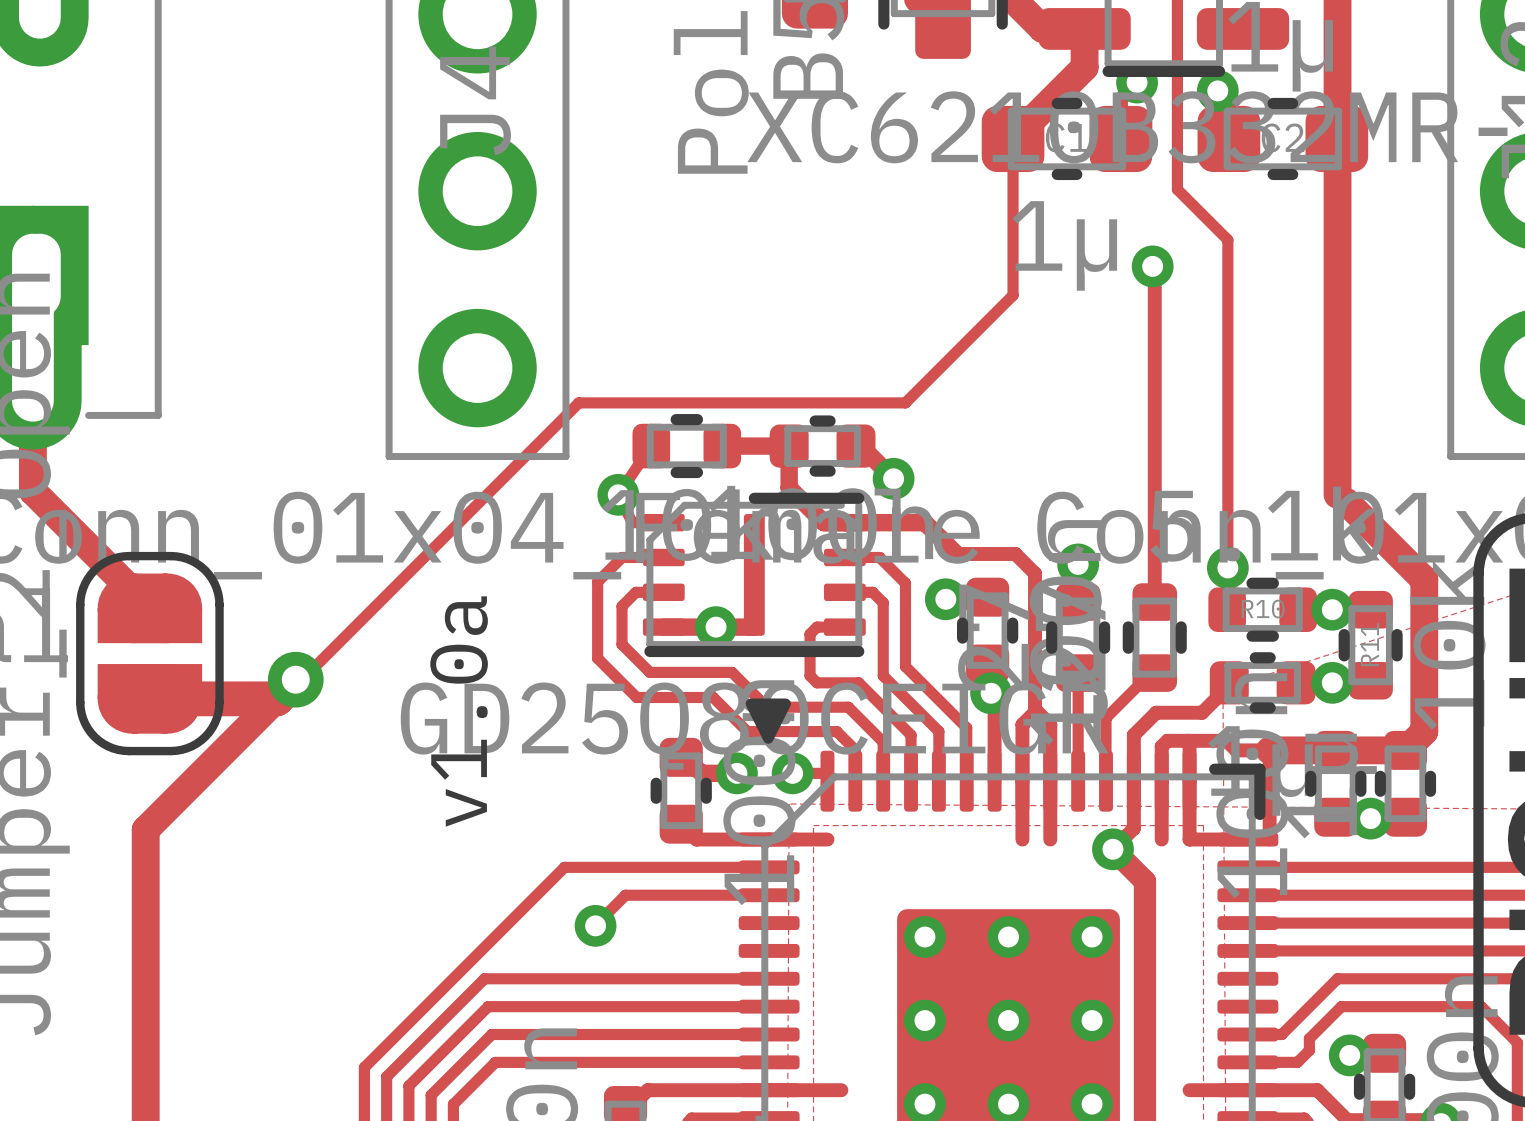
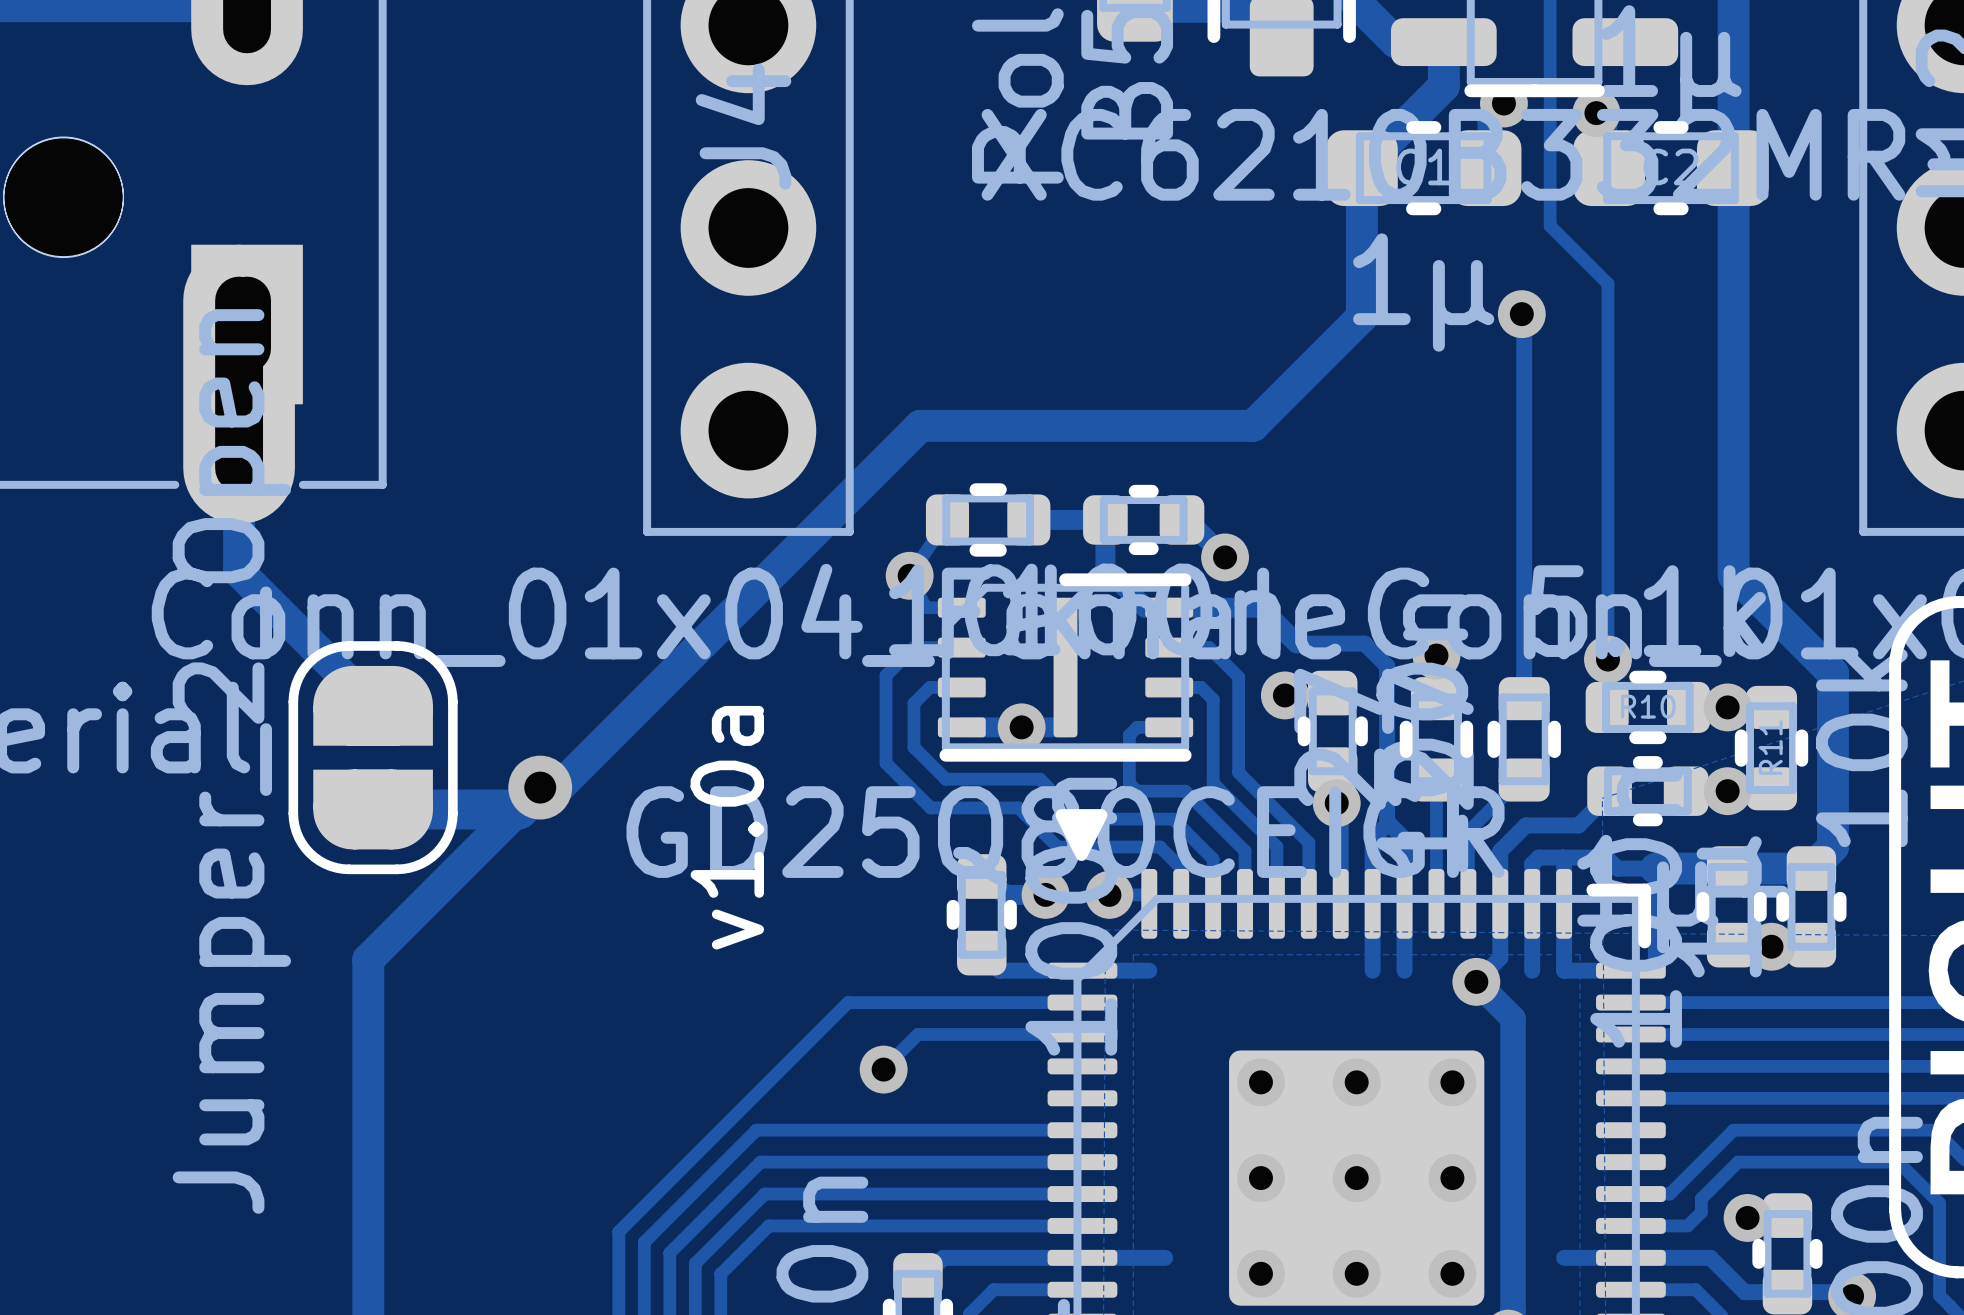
track width: thin (1013, 138) (1013, 268) -> thick (1361, 168) (1361, 316)
track: (1013, 268) (1013, 295) (905, 402) (578, 402) (302, 679) -> (1361, 316) (1252, 425) (920, 425) (558, 787) (547, 787)

